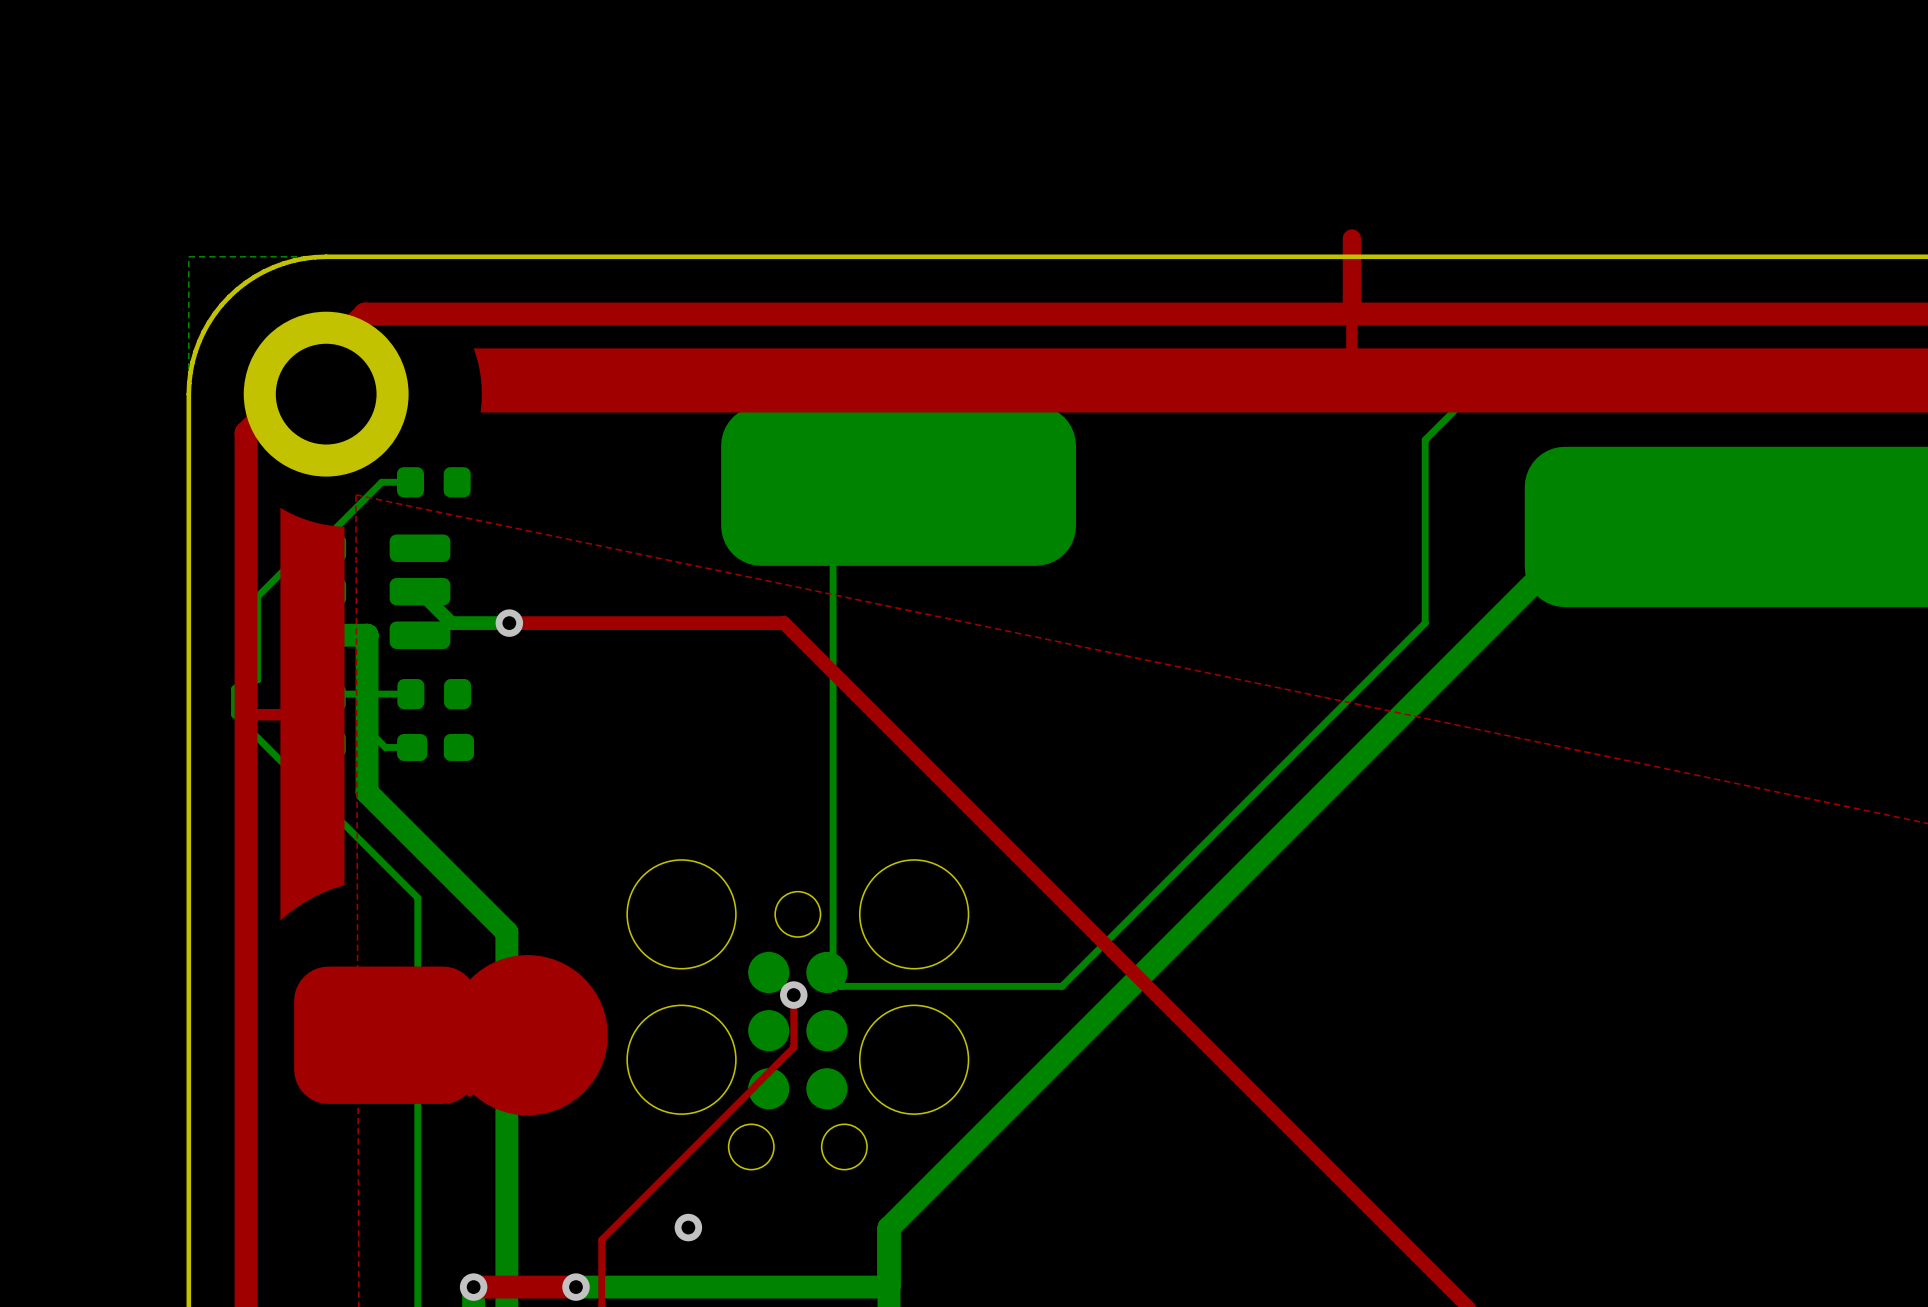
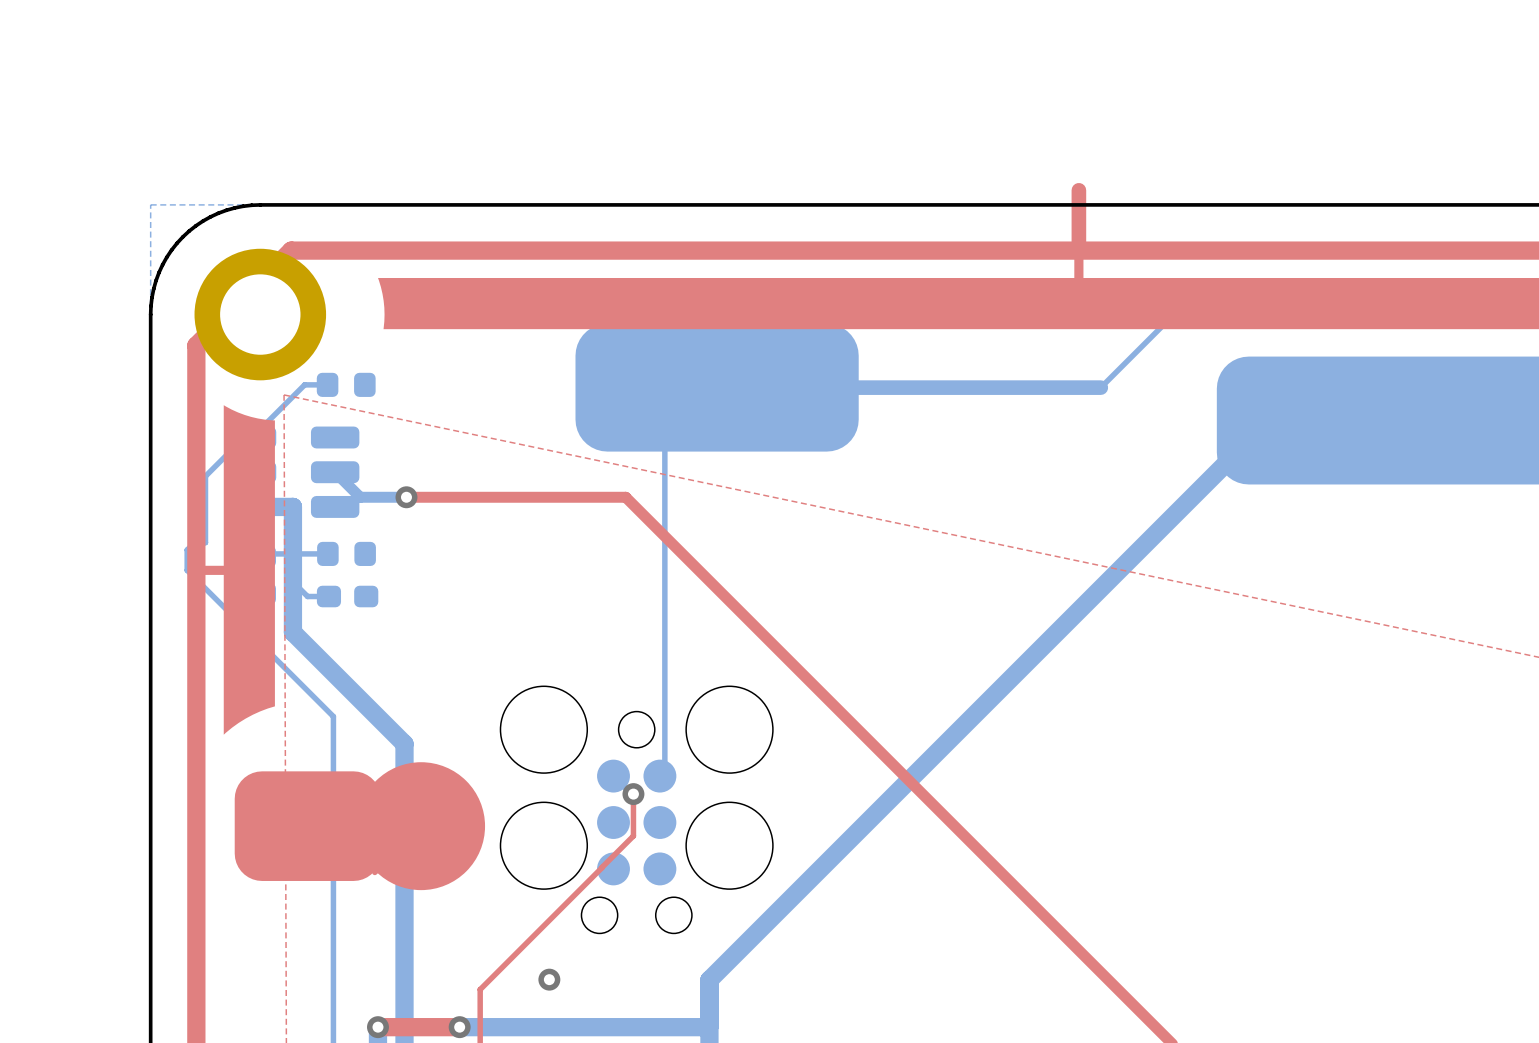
bottom track: (1425, 439) (1425, 623) (1061, 986) (840, 986) (826, 972) -> (1137, 351) (1100, 387) (717, 387)

